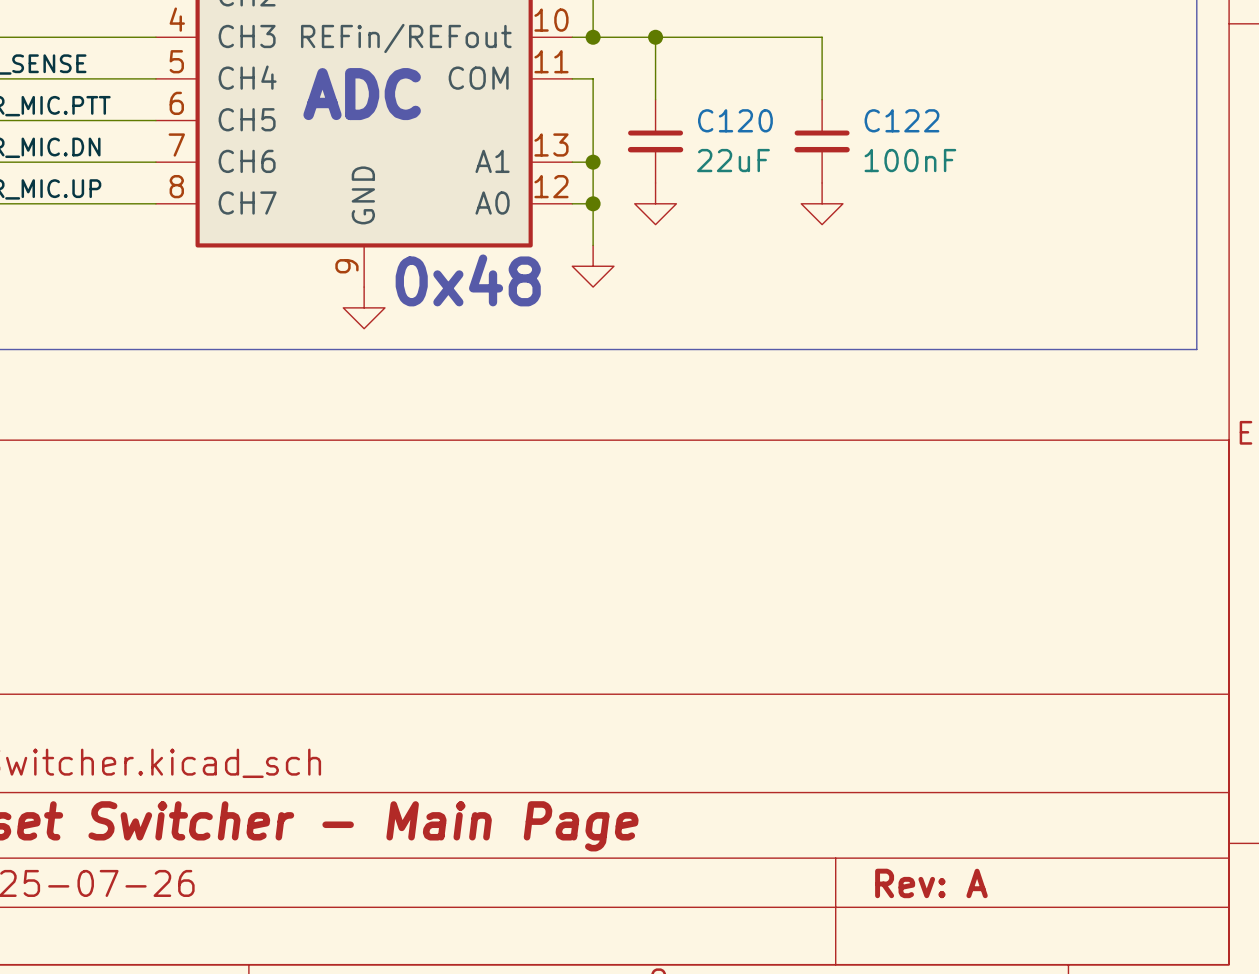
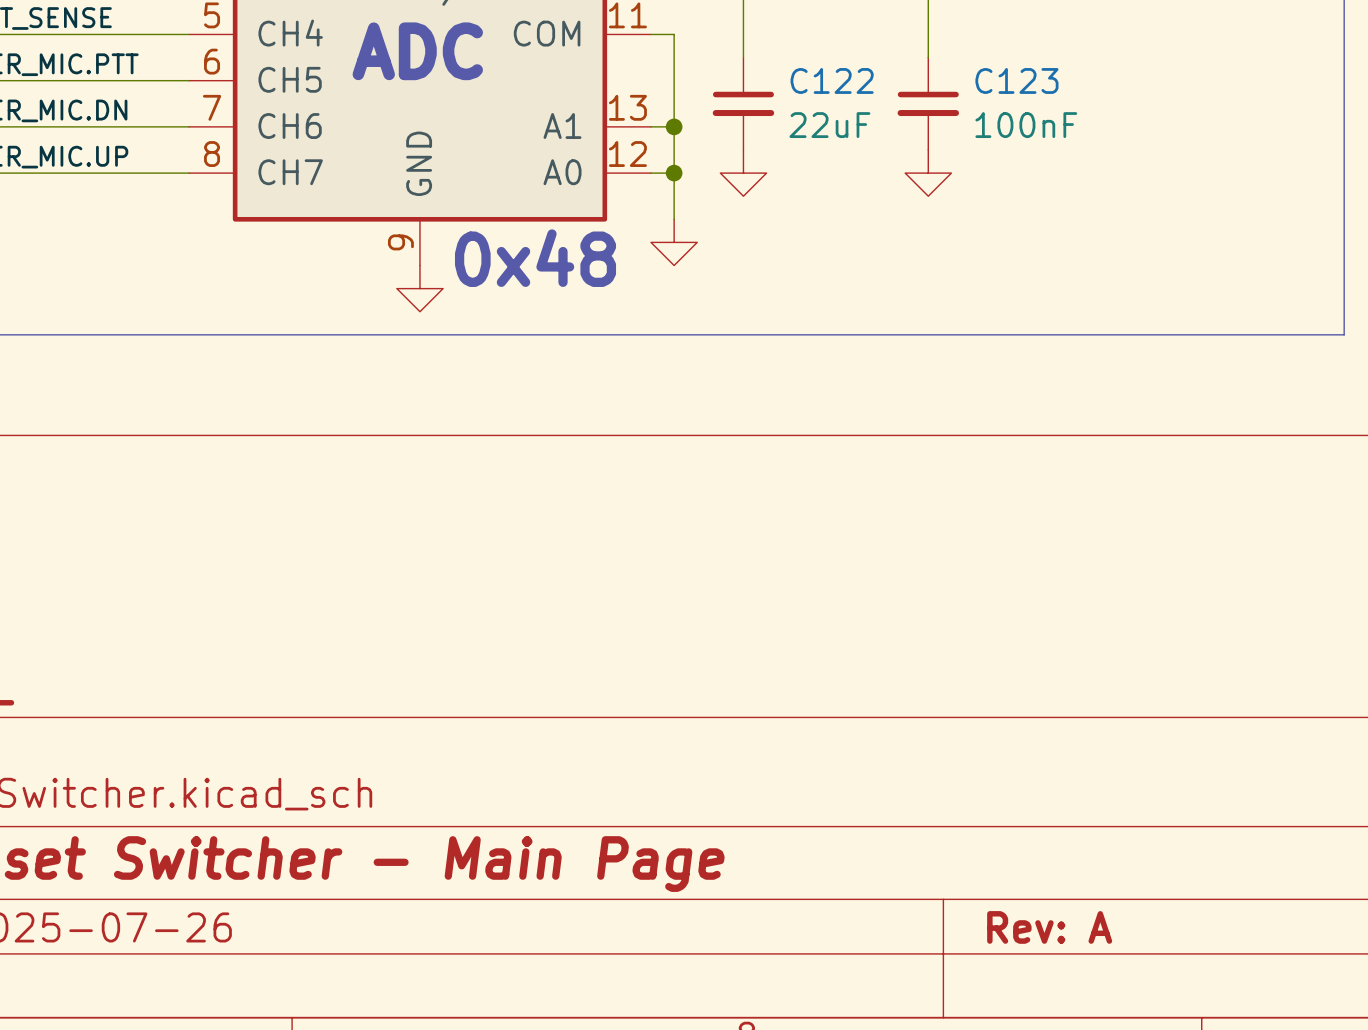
C120 name: C120 (735, 120) -> C122 (832, 80)
C122 name: C122 (901, 120) -> C123 (1016, 80)

